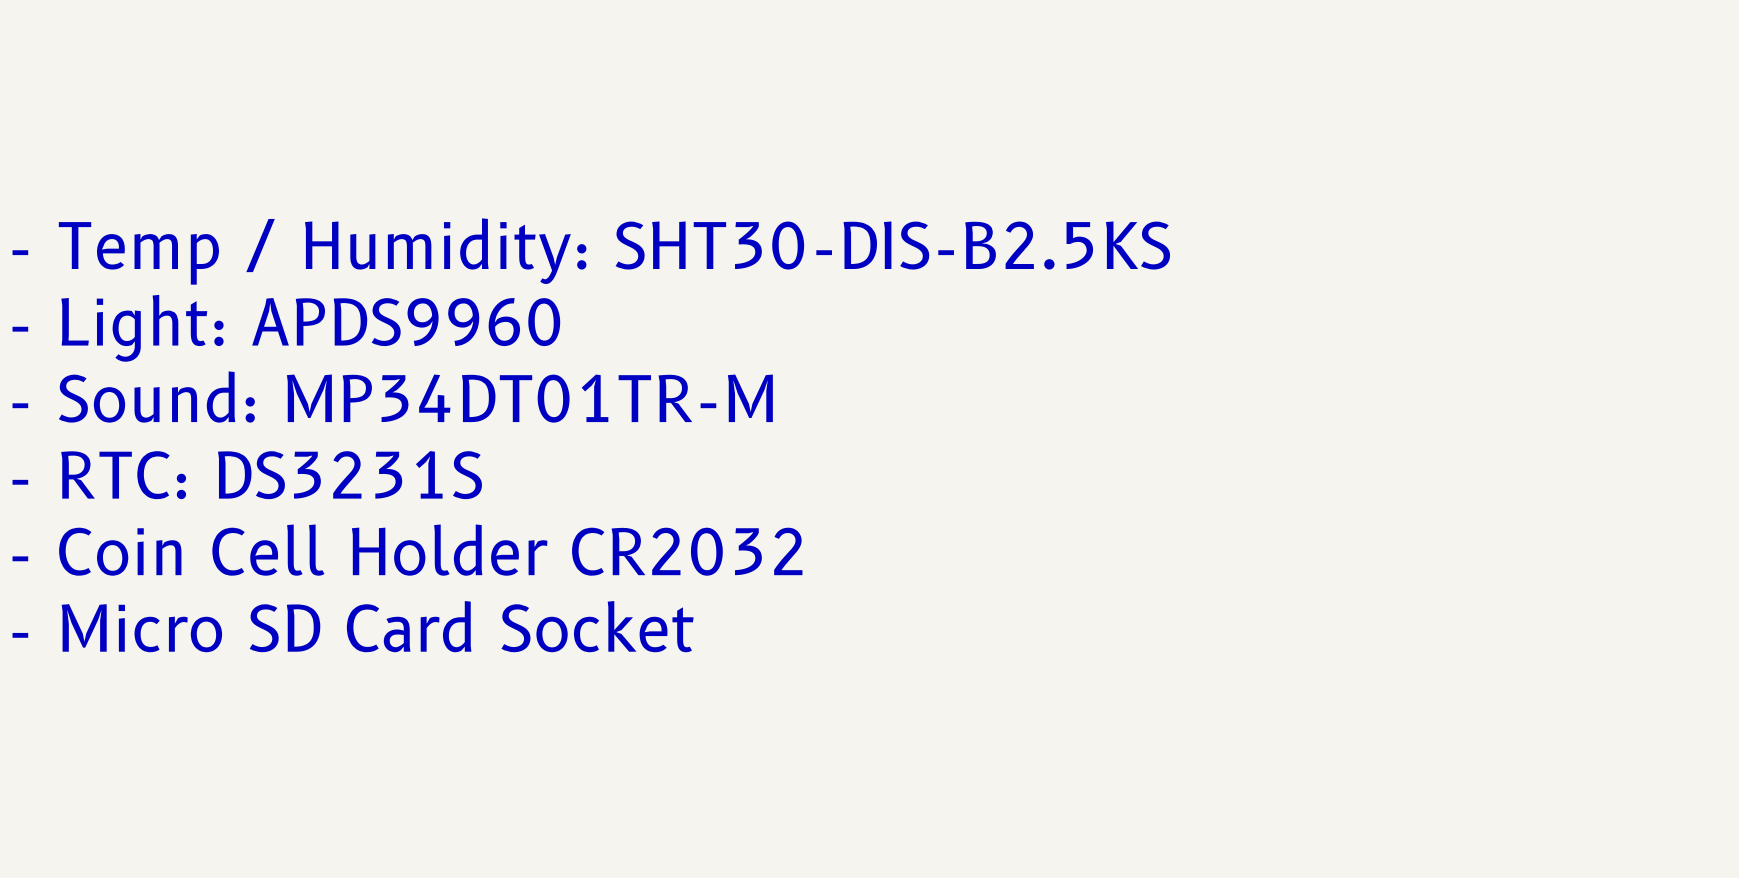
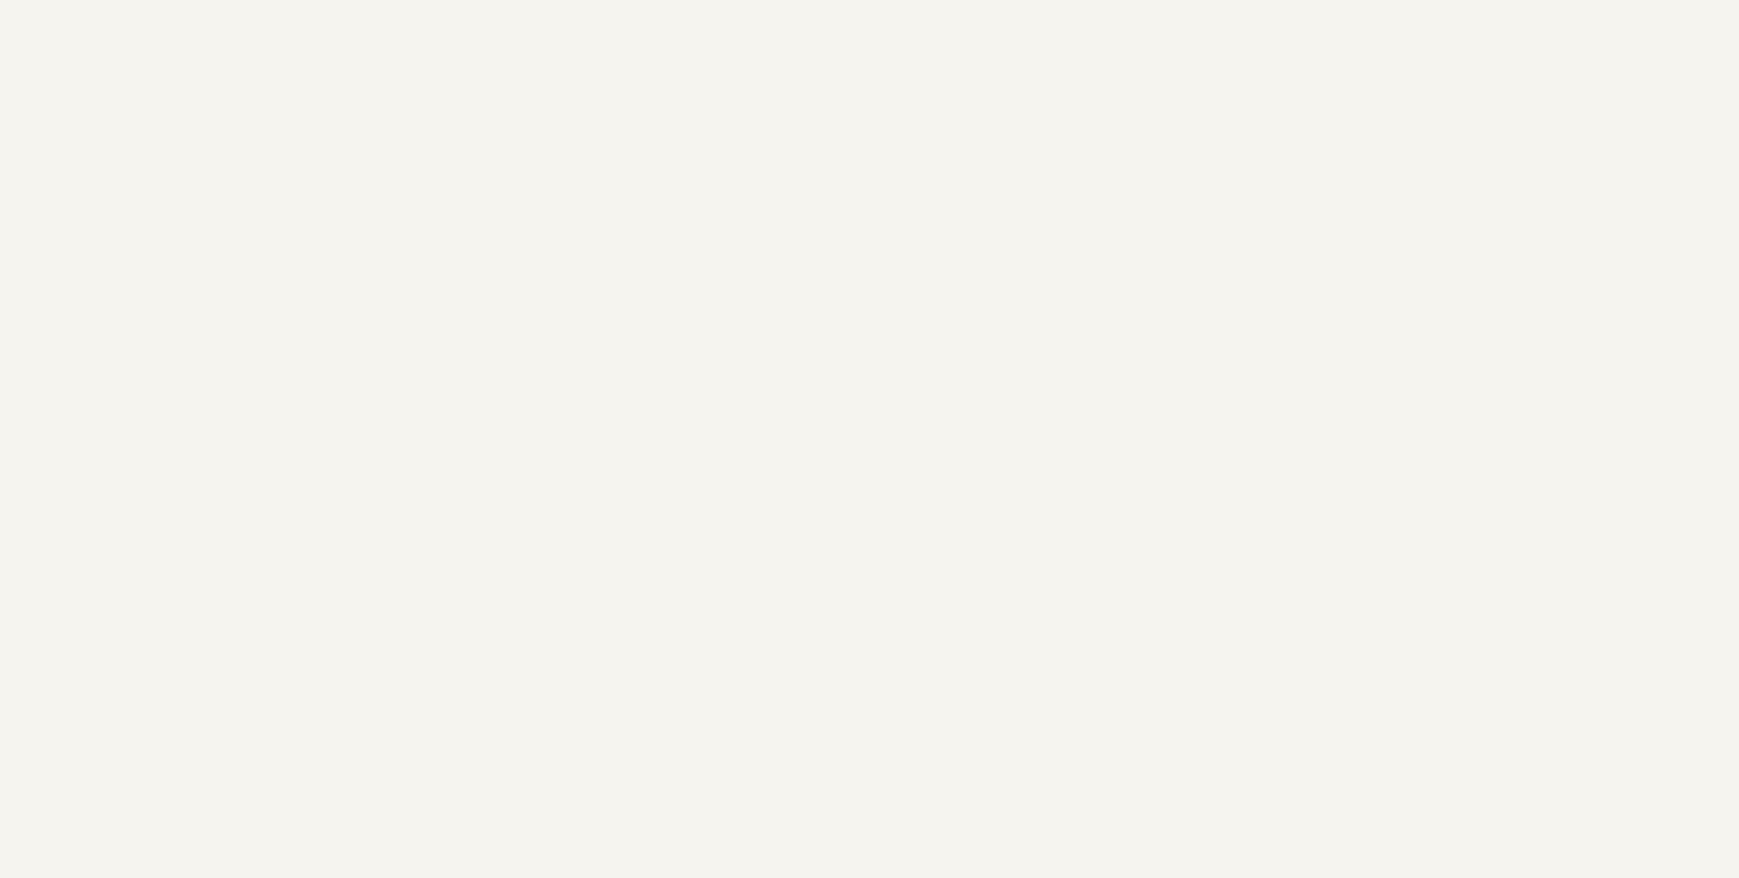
text: - Temp / Humidity: SHT30-DIS-B2.5KS (591, 251) -> none
text: - Light: APDS9960 (286, 328) -> none
text: - Sound: MP34DT01TR-M (392, 397) -> none
text: - RTC: DS3231S (247, 475) -> none
text: - Coin Cell Holder CR2032 (407, 550) -> none
text: - Micro SD Card Socket (353, 626) -> none

